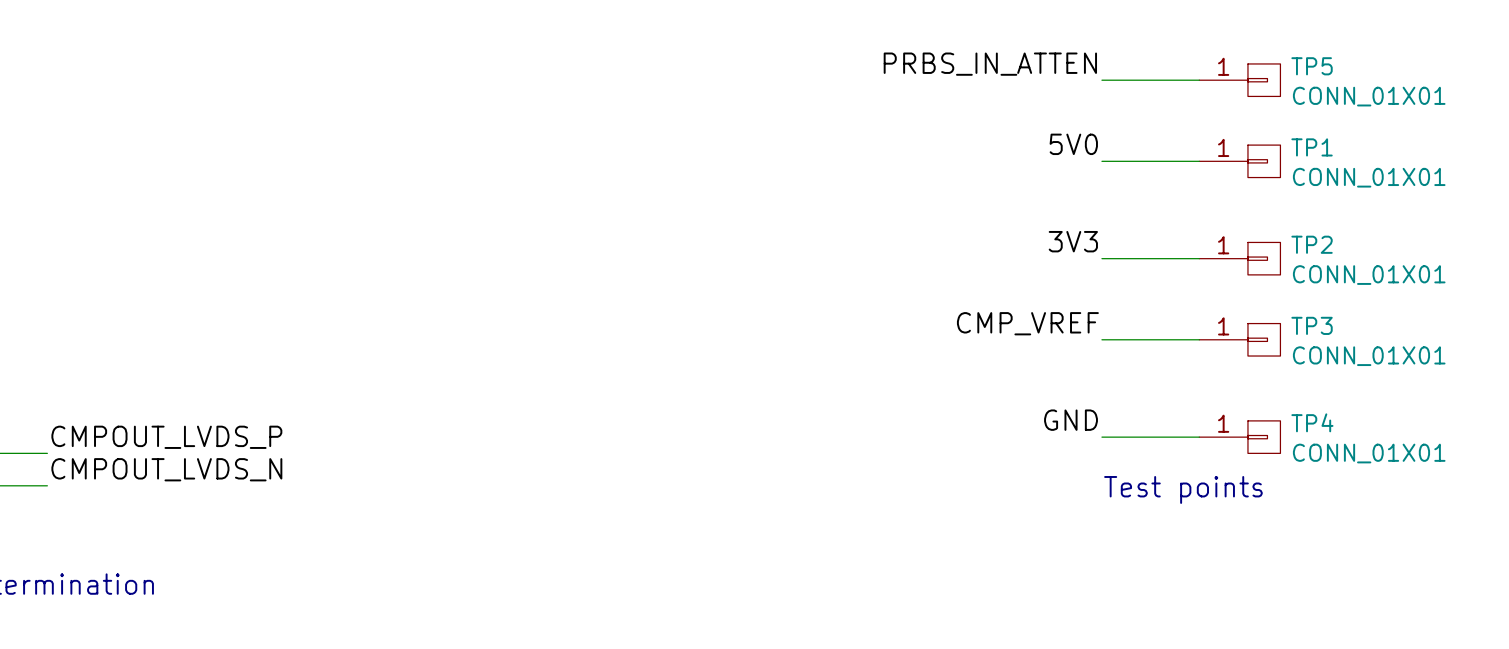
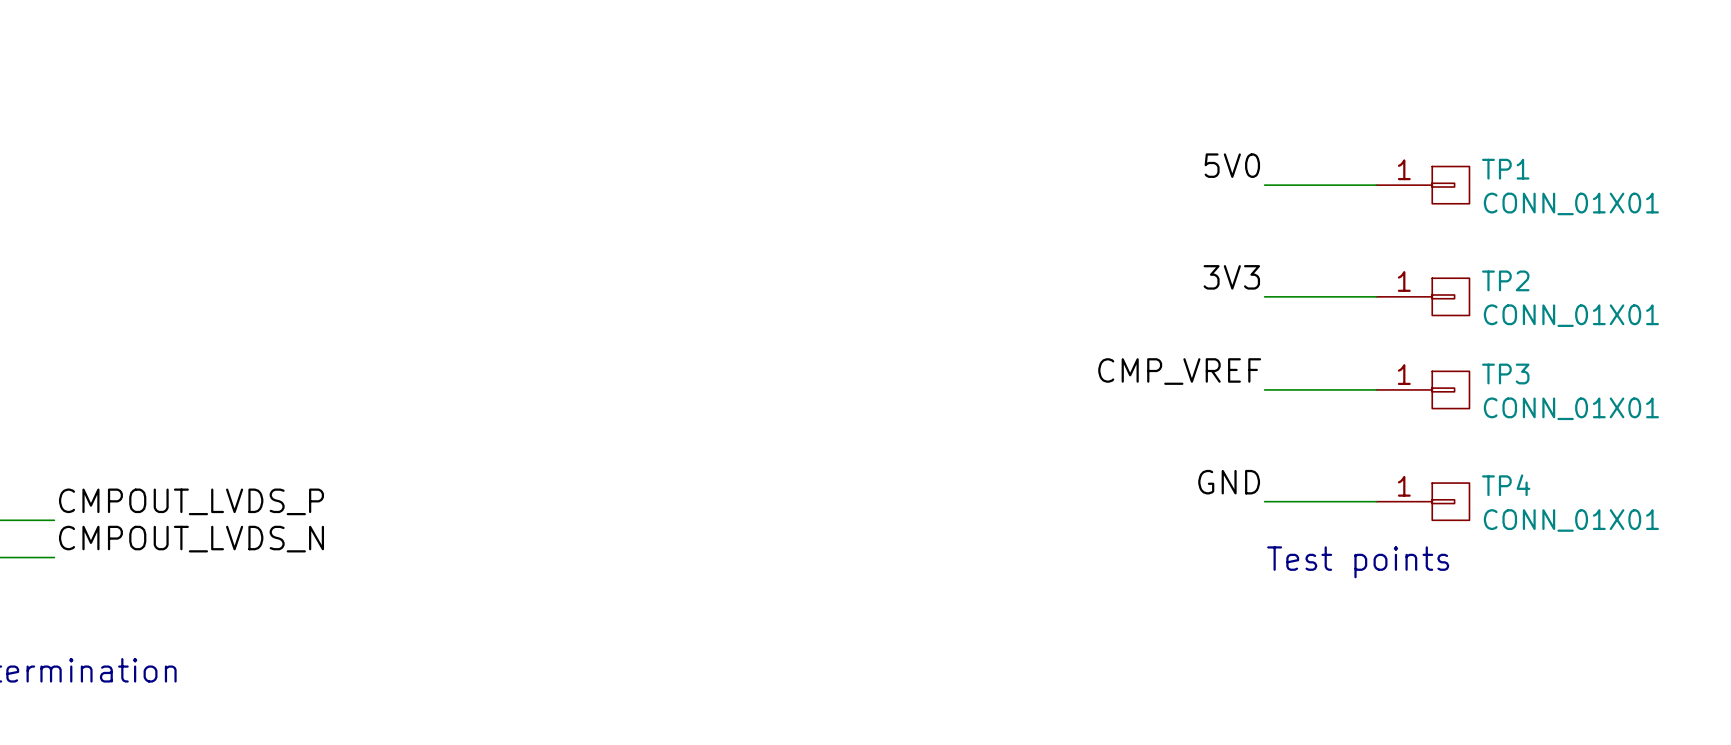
label: PRBS_IN_ATTEN (990, 64) -> none
wire: (1101, 80) (1199, 80) -> none
TP5: CONN_01X01 (1239, 80) -> none

